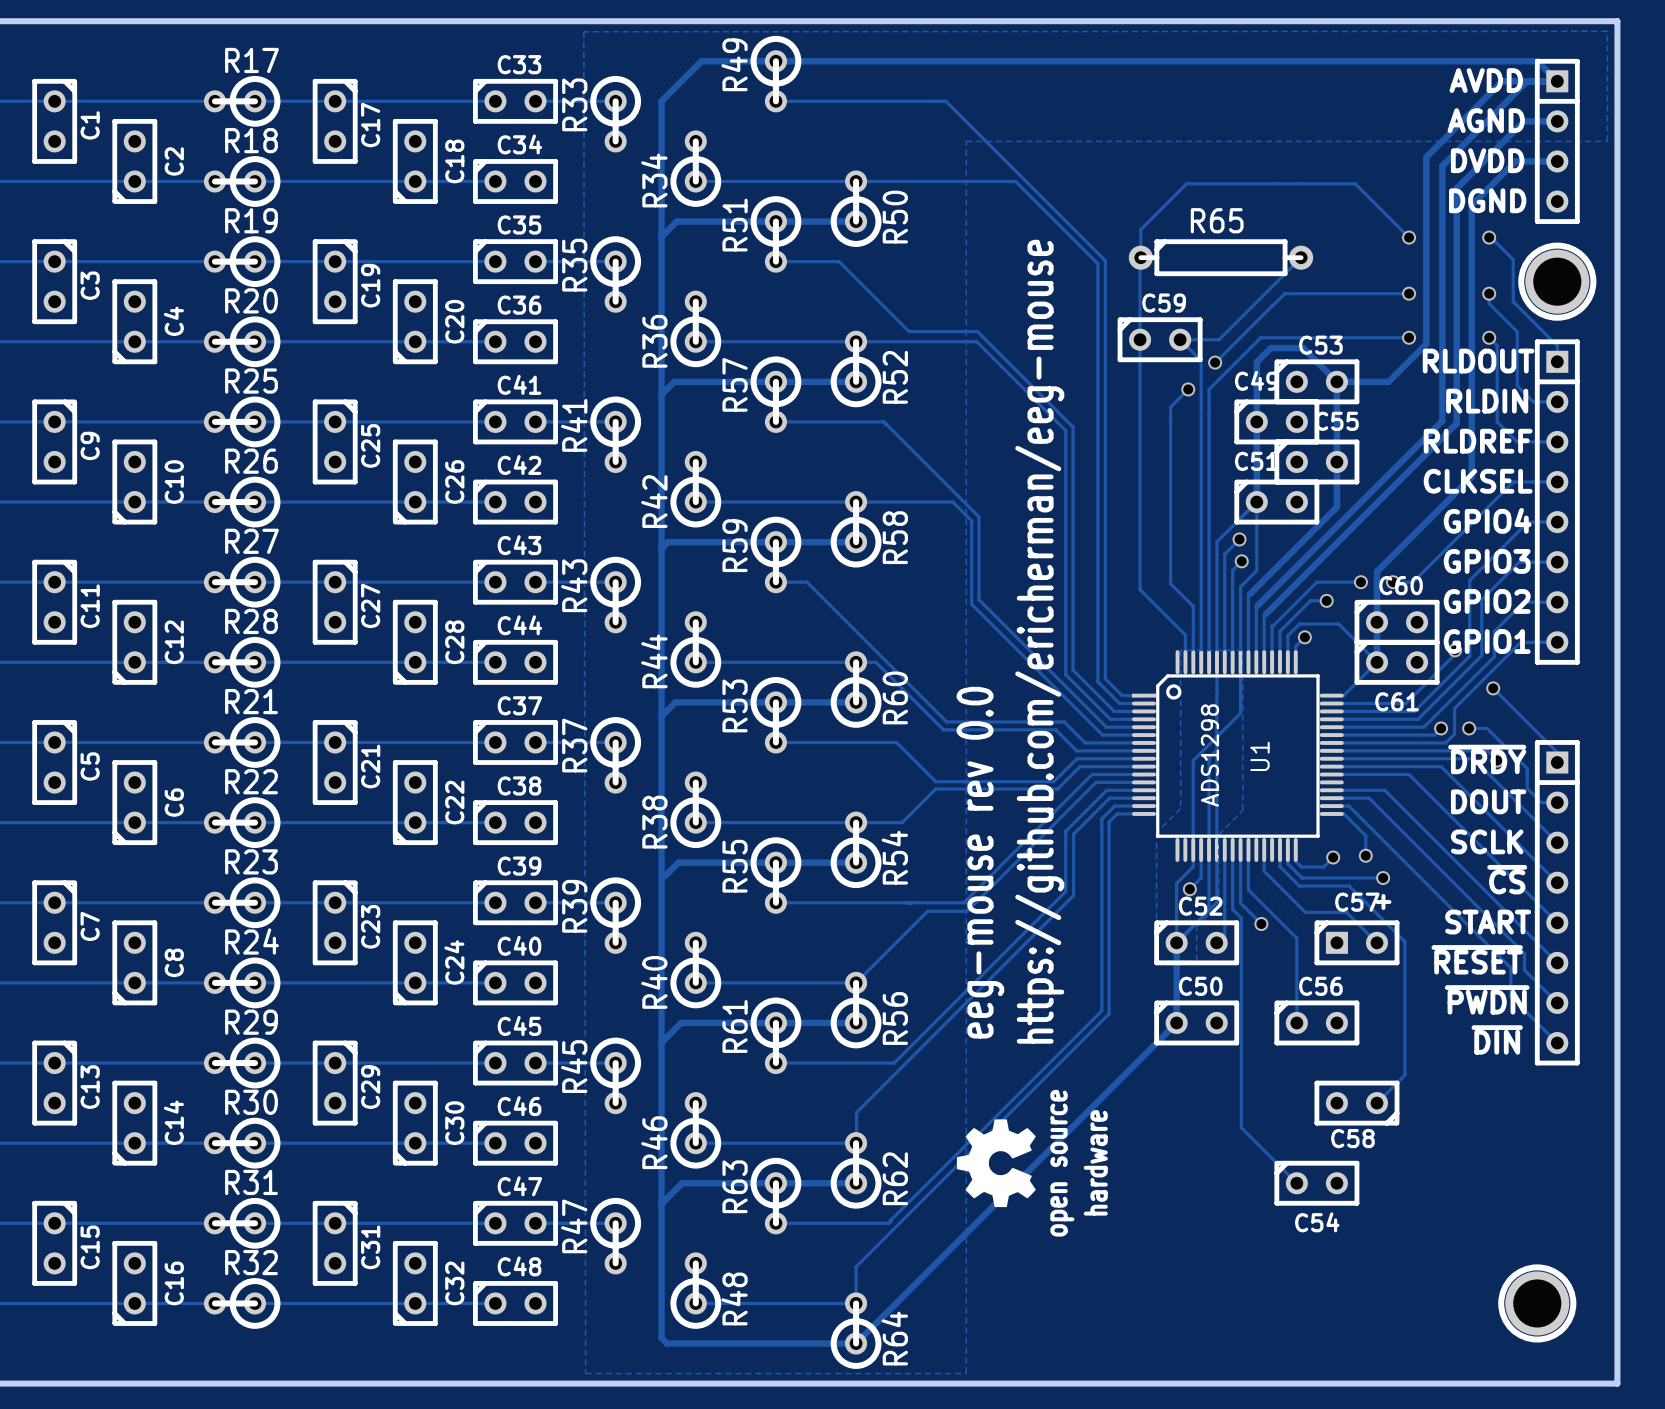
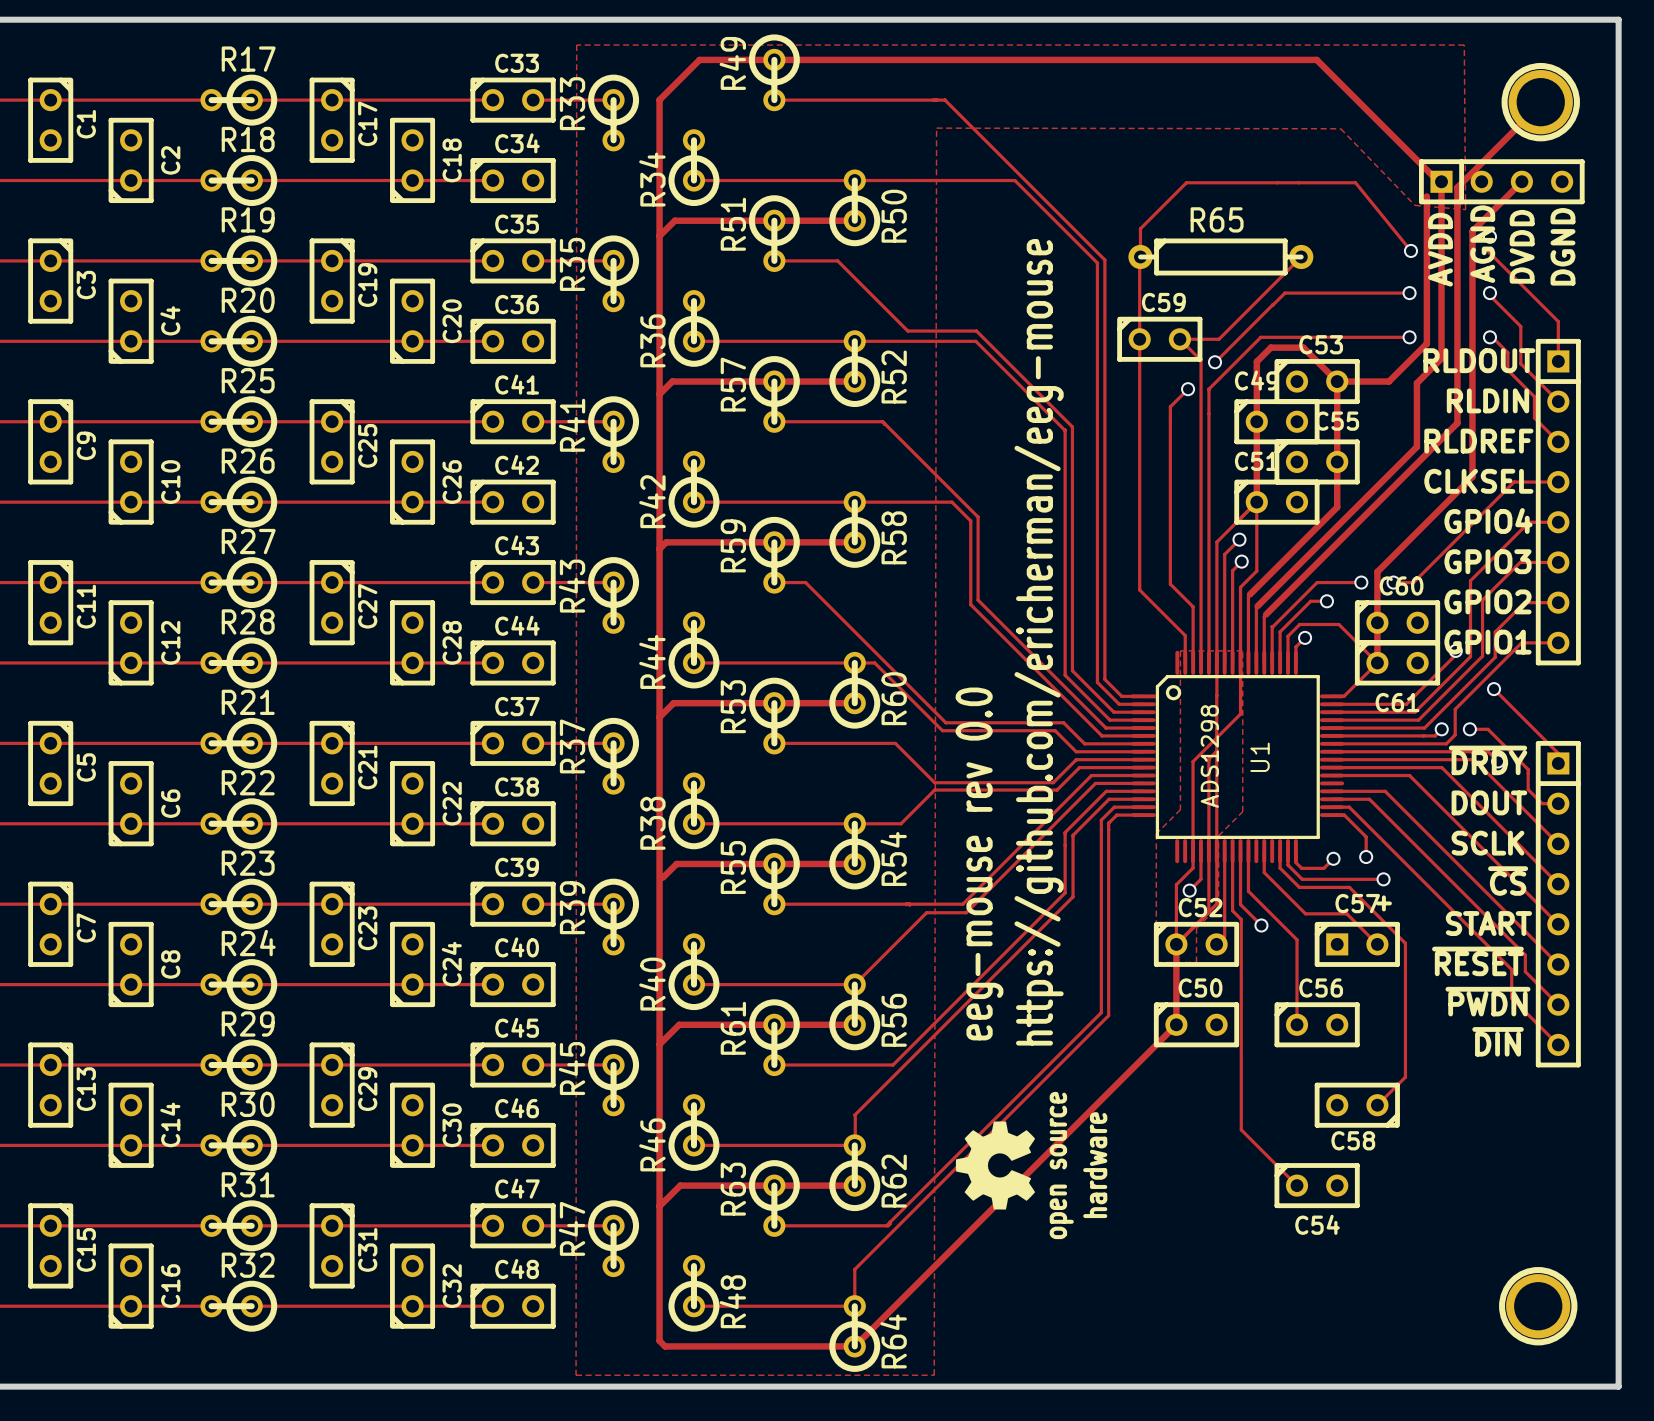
zone outline: (1607, 31) (1607, 141) (966, 141) (966, 1373) (585, 1373) (583, 31) (1607, 31) -> (576, 45) (576, 1375) (934, 1375) (936, 128) (1340, 128) (1414, 205) (1465, 209) (1464, 45) (576, 45)
track: (1316, 61) (1537, 61) (1557, 81) (1502, 81) (1426, 157) (1426, 197) -> none
text rotation: 0° (1486, 80) -> 90° counterclockwise (1440, 249)
text position: AVDD (1486, 80) -> AVDD (1440, 249)
track: (1527, 81) (1442, 166) (1442, 420) (1257, 605) -> (1316, 59) (1438, 181) (1441, 181) (1441, 358) (1416, 383) (1416, 446) (1257, 606)
text rotation: 0° (1486, 120) -> 90° counterclockwise (1482, 244)
text position: AGND (1486, 120) -> AGND (1482, 244)
part rotation: 0° (1557, 141) -> 90° counterclockwise (1501, 181)
text rotation: 0° (1487, 160) -> 90° counterclockwise (1522, 246)
track: (1557, 161) (1515, 161) (1471, 205) (1471, 232) -> (1521, 181) (1472, 231)
track: (1355, 183) (1409, 237) -> (1355, 182) (1410, 250)
text rotation: 0° (1487, 200) -> 90° counterclockwise (1562, 246)
via position: (1409, 237) -> (1410, 250)
track: (1489, 237) (1513, 259) (1513, 301) (1557, 345) -> (1487, 250) (1558, 321) (1558, 345)
part position: (1557, 281) -> (1540, 102)
track: (1489, 293) (1489, 303) (1517, 331) (1517, 385) (1533, 401) (1557, 401) -> (1487, 293) (1520, 326) (1520, 363) (1558, 401)
track: (1489, 337) (1497, 345) (1497, 421) (1517, 441) (1557, 441) -> (1492, 336) (1507, 352) (1507, 370) (1534, 396) (1534, 417) (1558, 441)

